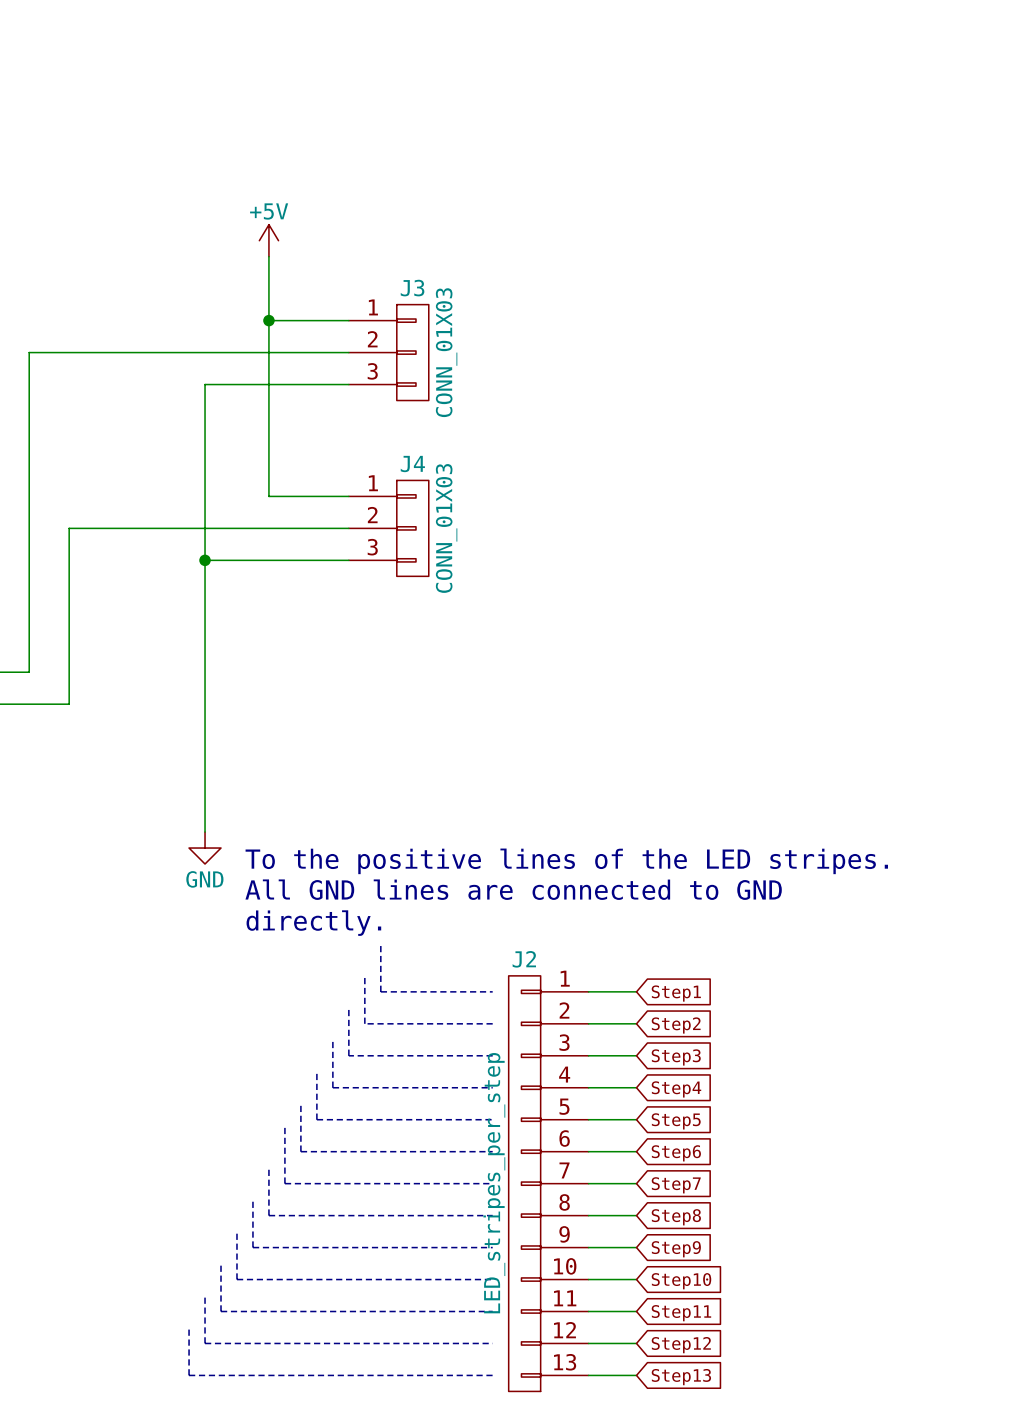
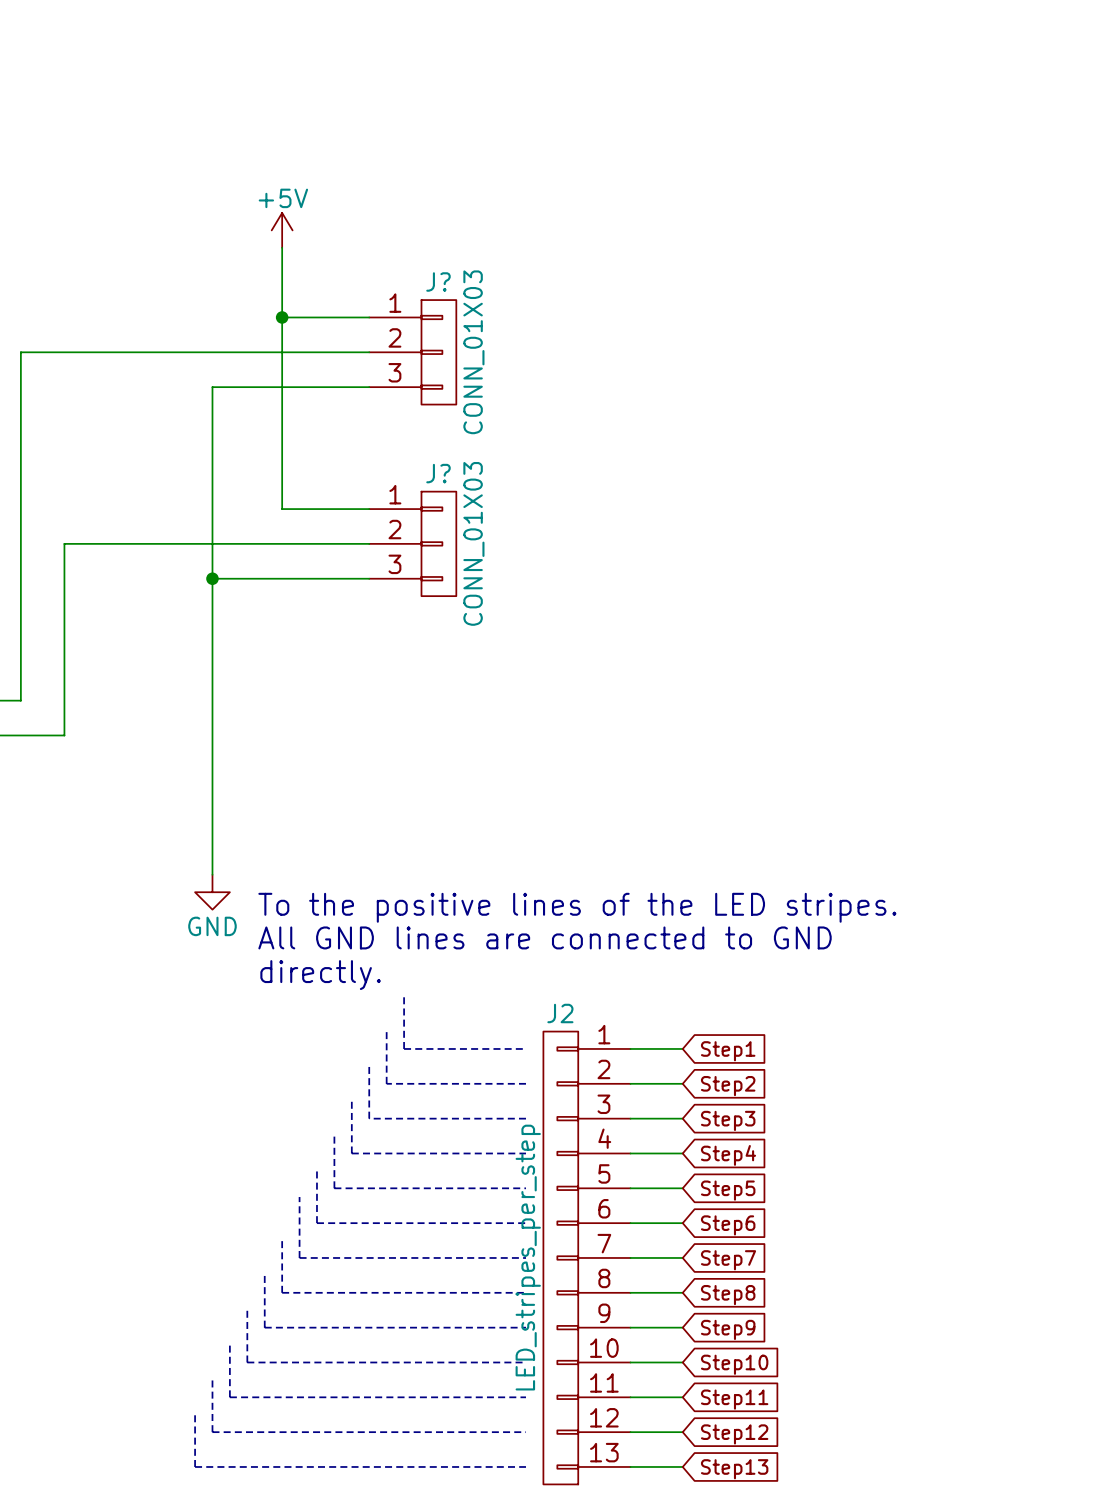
J3 name: J3 (412, 288) -> J? (438, 281)
J4 name: J4 (412, 464) -> J? (438, 473)

